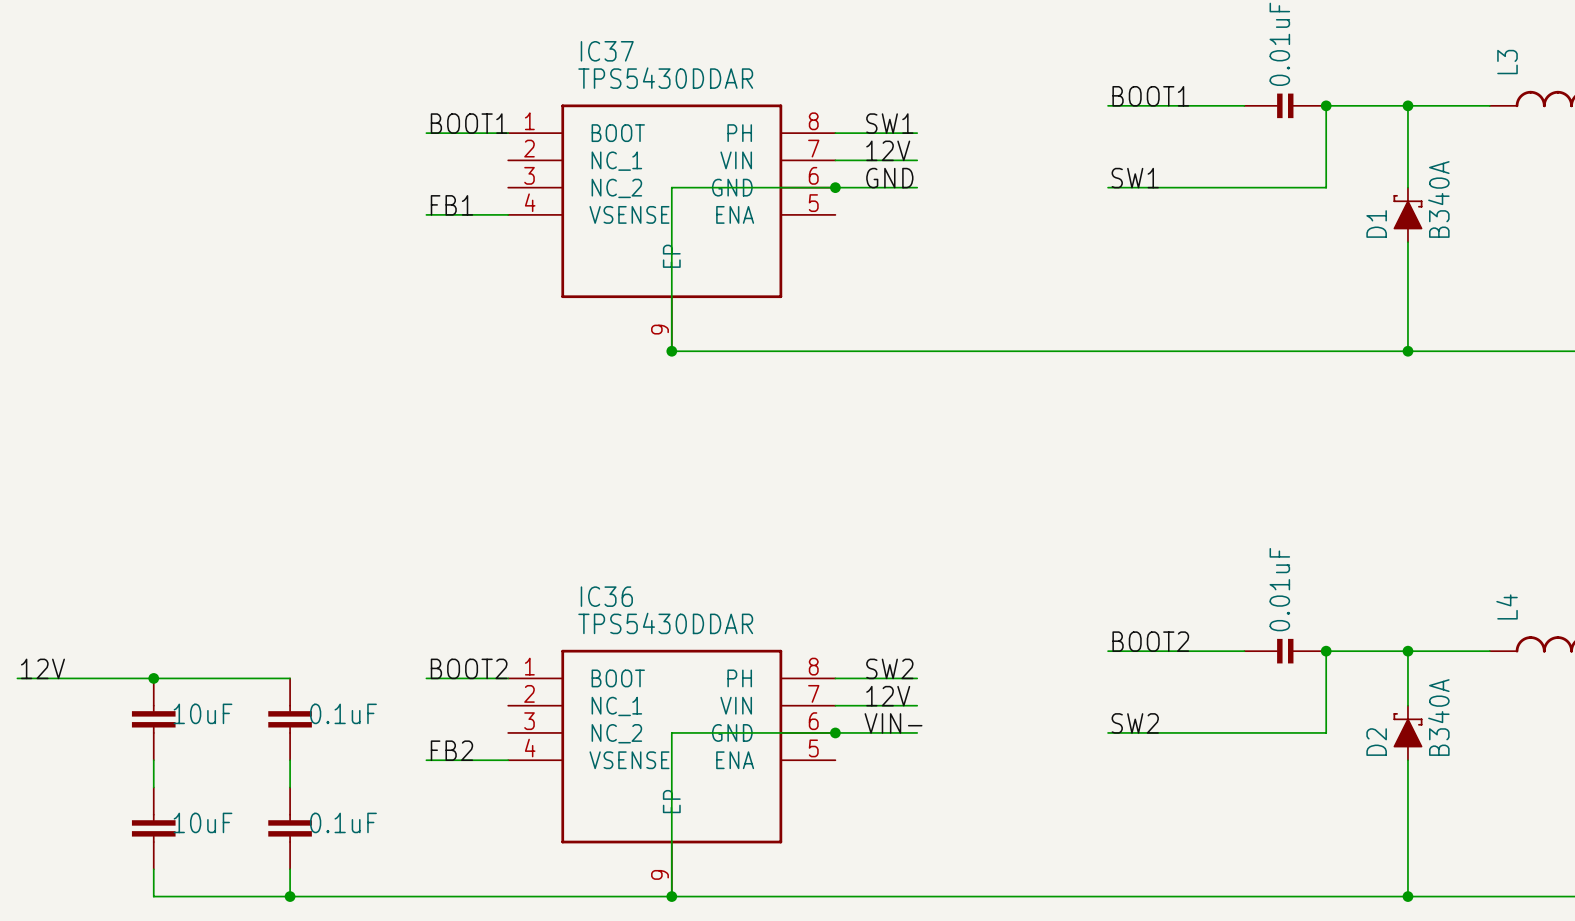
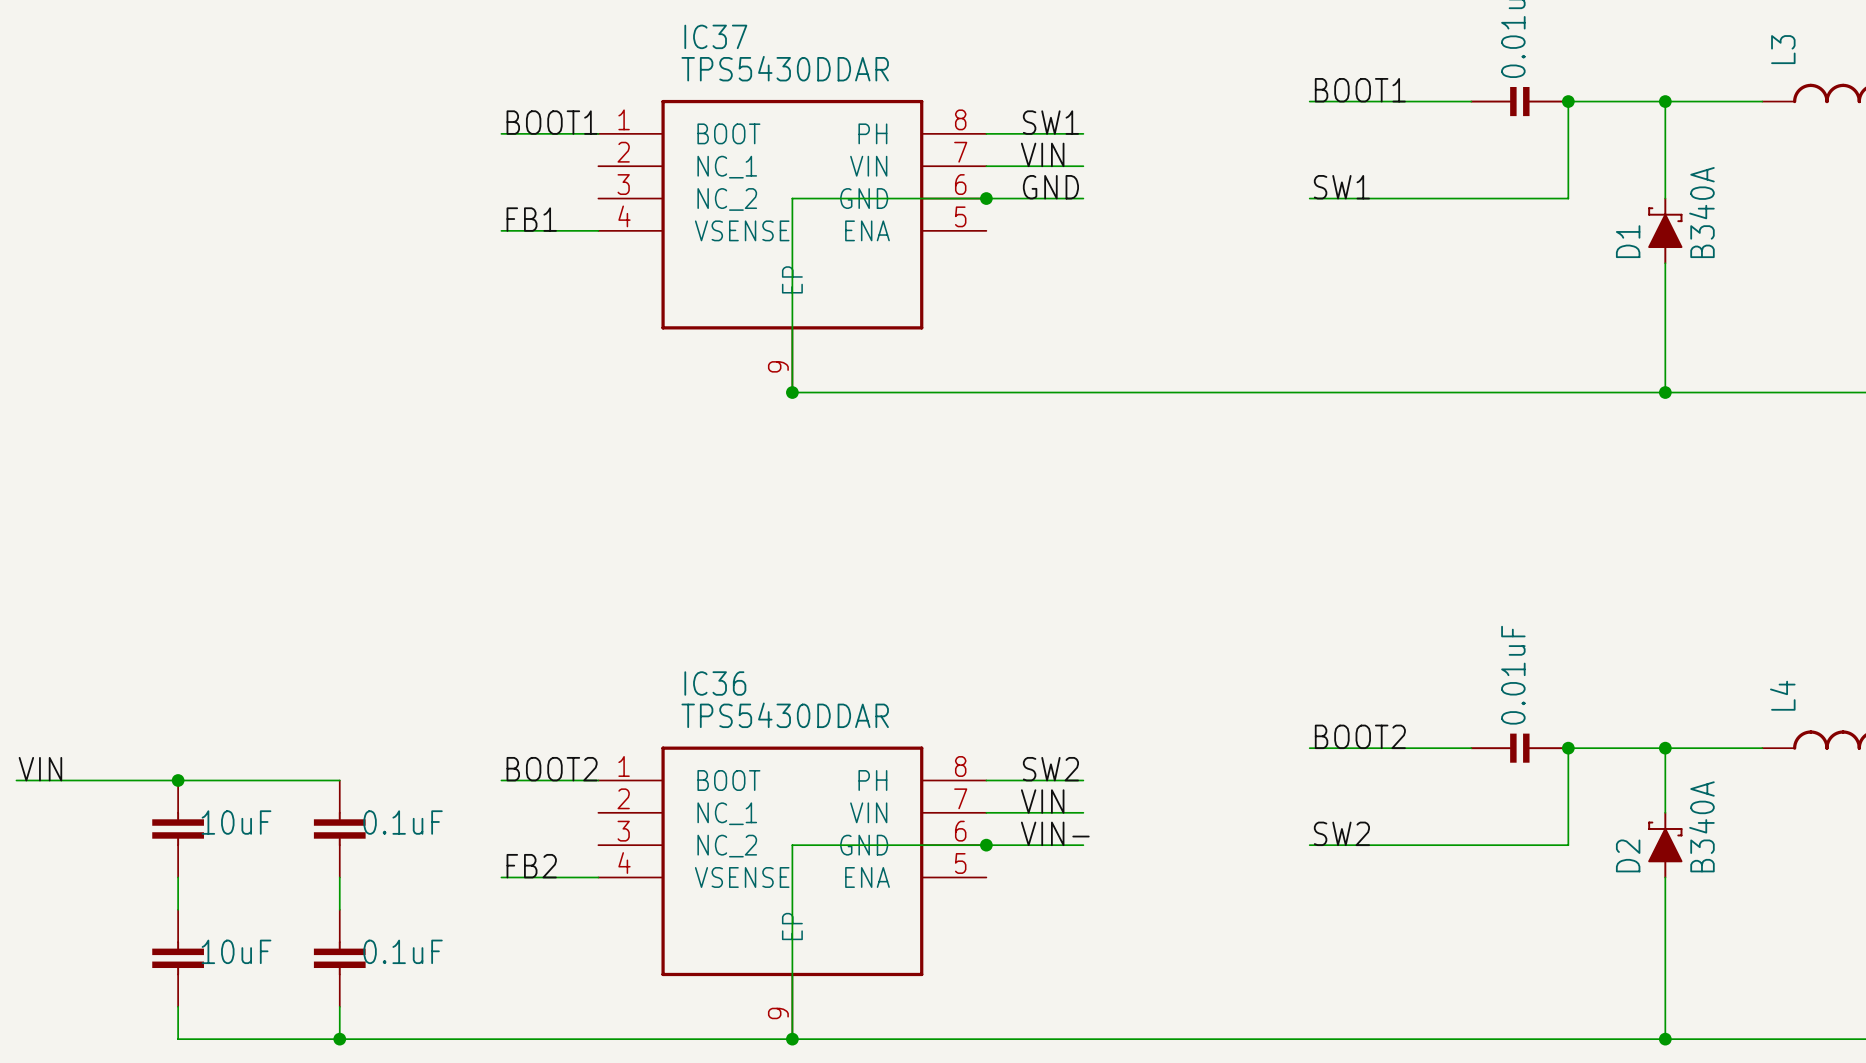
label: 12V (888, 150) -> VIN (1042, 154)
label: 12V (42, 668) -> VIN (40, 769)
label: 12V (888, 696) -> VIN (1042, 801)

